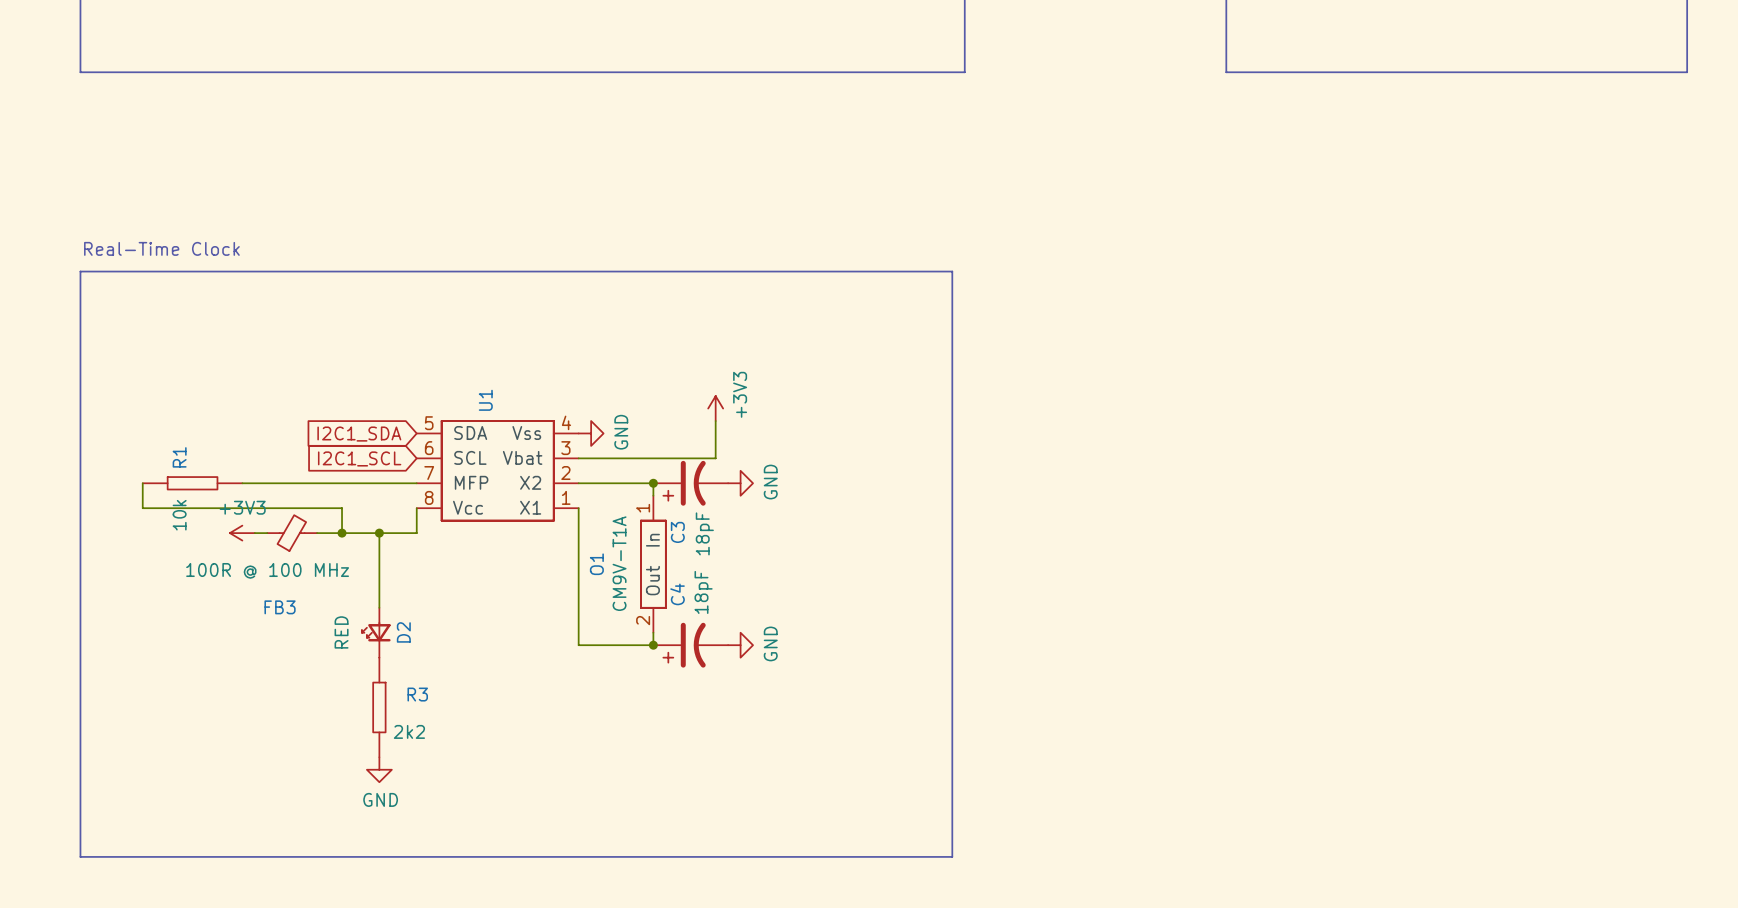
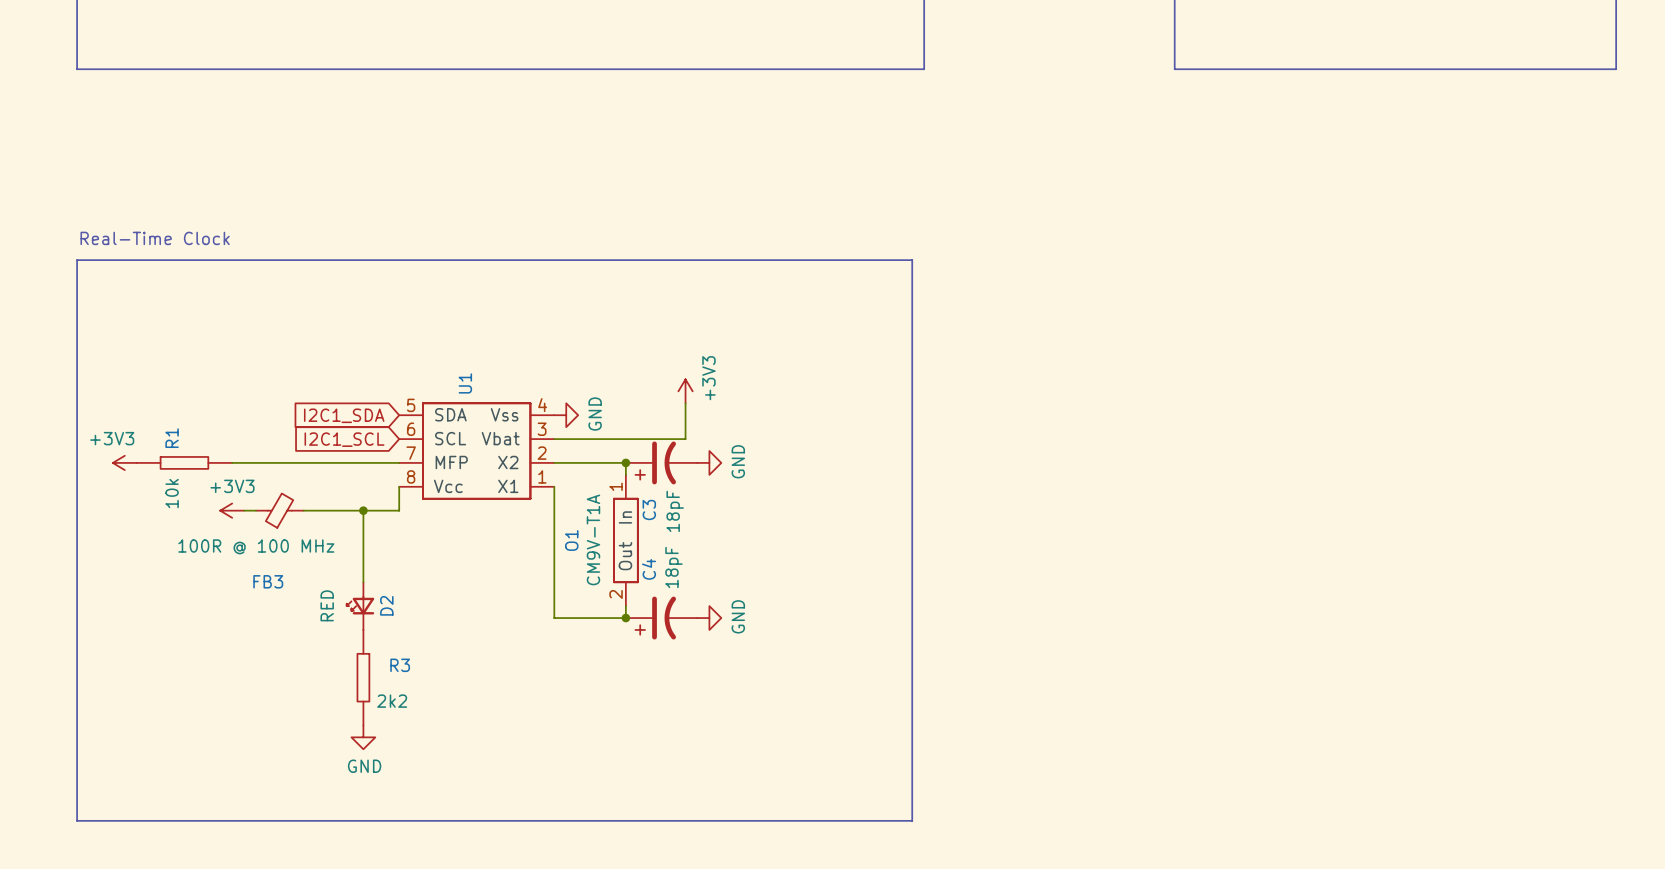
power symbol: none -> +3V3 (124, 462)
wire: (142, 483) (142, 508) (342, 508) (342, 533) -> none
junction: (342, 533) -> none

